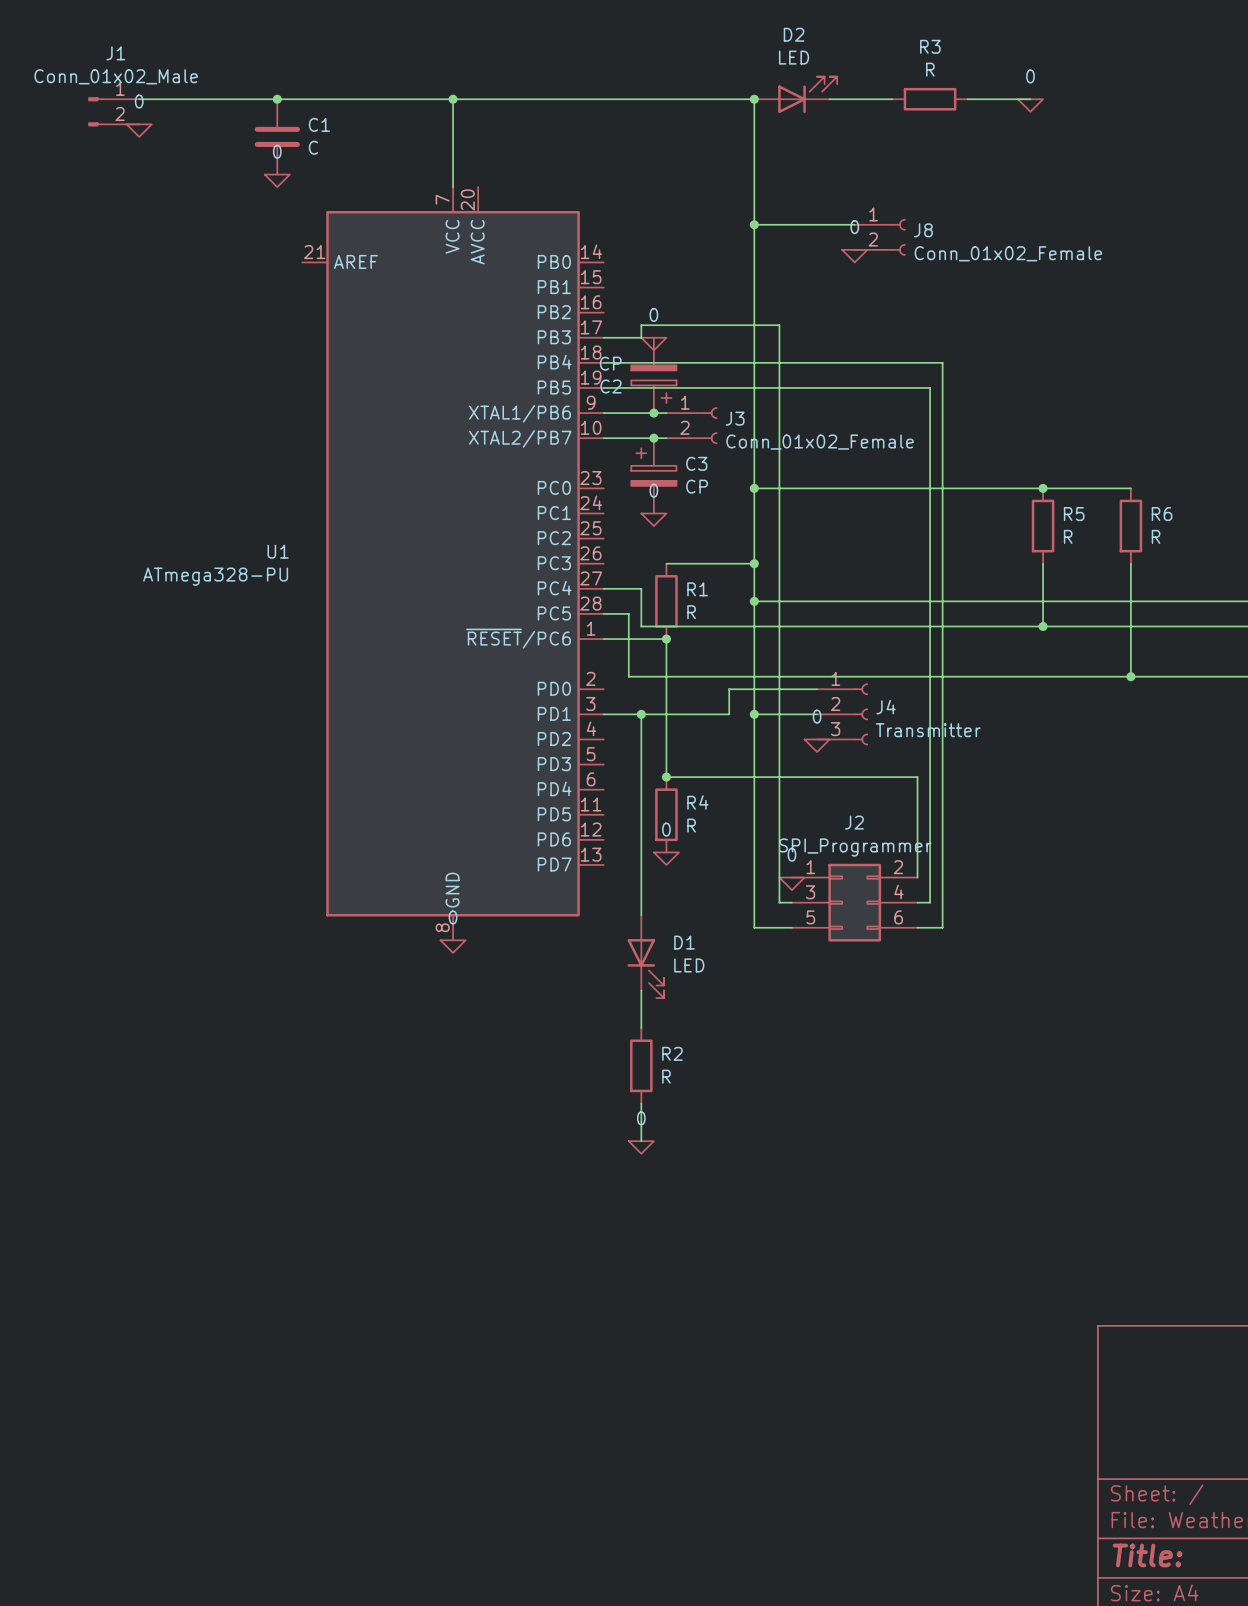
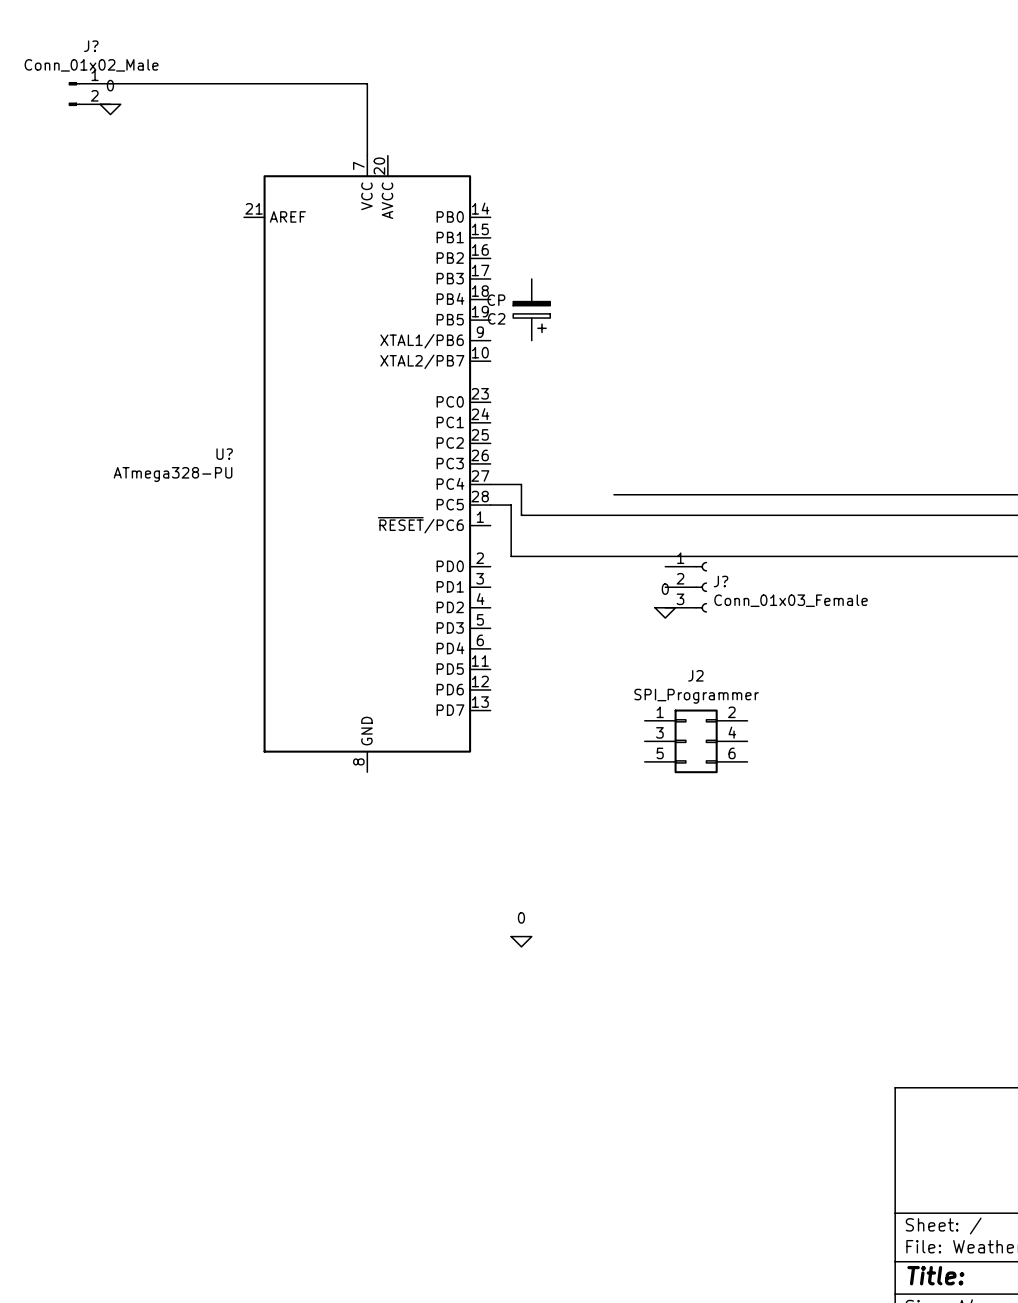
J1 name: J1 (115, 53) -> J? (91, 46)
D2: LED (795, 94) -> none
junction: (277, 99) -> none
wire: (453, 99) (754, 99) (754, 927) (791, 927) -> none
junction: (453, 99) -> none
junction: (754, 99) -> none
wire: (829, 99) (892, 99) -> none
R3: R (930, 99) -> none
wire: (967, 99) (1030, 99) -> none
power symbol: 0 (1030, 105) -> none
C1: C (277, 136) -> none
power symbol: 0 (277, 180) -> none
wire: (754, 224) (854, 224) -> none
junction: (754, 224) -> none
J8: Conn_01x02_Female (880, 237) -> none
power symbol: 0 (854, 256) -> none
wire: (603, 337) (641, 337) (641, 325) (779, 325) (779, 902) (791, 902) -> none
power symbol: 0 (653, 344) -> none
wire: (603, 362) (942, 362) (942, 927) (917, 927) -> none
wire: (603, 387) (930, 387) (930, 902) (917, 902) -> none
wire: (603, 413) (666, 413) -> none
junction: (653, 413) -> none
J3: Conn_01x02_Female (691, 425) -> none
wire: (603, 438) (666, 438) -> none
junction: (653, 438) -> none
C3: CP (653, 475) -> none
wire: (754, 488) (1130, 488) -> none
junction: (754, 488) -> none
junction: (1043, 488) -> none
power symbol: 0 (653, 519) -> none
R5: R (1043, 526) -> none
R6: R (1130, 526) -> none
U1 name: U1 (278, 551) -> U? (224, 454)
wire: (666, 563) (754, 563) -> none
junction: (754, 563) -> none
wire: (1043, 563) (1043, 626) -> none
wire: (1130, 563) (1130, 676) -> none
R1: R (666, 601) -> none
junction: (754, 601) -> none
junction: (1043, 626) -> none
wire: (603, 639) (666, 639) (666, 777) (917, 777) (917, 877) -> none
junction: (666, 639) -> none
junction: (1130, 676) -> none
wire: (817, 689) (729, 689) (729, 714) (603, 714) -> none
J4 name: J4 (886, 707) -> J? (721, 581)
wire: (641, 714) (641, 915) -> none
junction: (641, 714) -> none
wire: (754, 714) (817, 714) -> none
junction: (754, 714) -> none
J4 value: Transmitter (928, 730) -> Conn_01x03_Female (791, 600)
junction: (666, 777) -> none
R4: R (666, 814) -> none
power symbol: 0 (666, 858) -> none
power symbol: 0 (791, 883) -> none
power symbol: 0 (453, 946) -> none
D1: LED (645, 956) -> none
wire: (641, 990) (641, 1028) -> none
R2: R (641, 1065) -> none
wire: (641, 1103) (641, 1141) -> none

